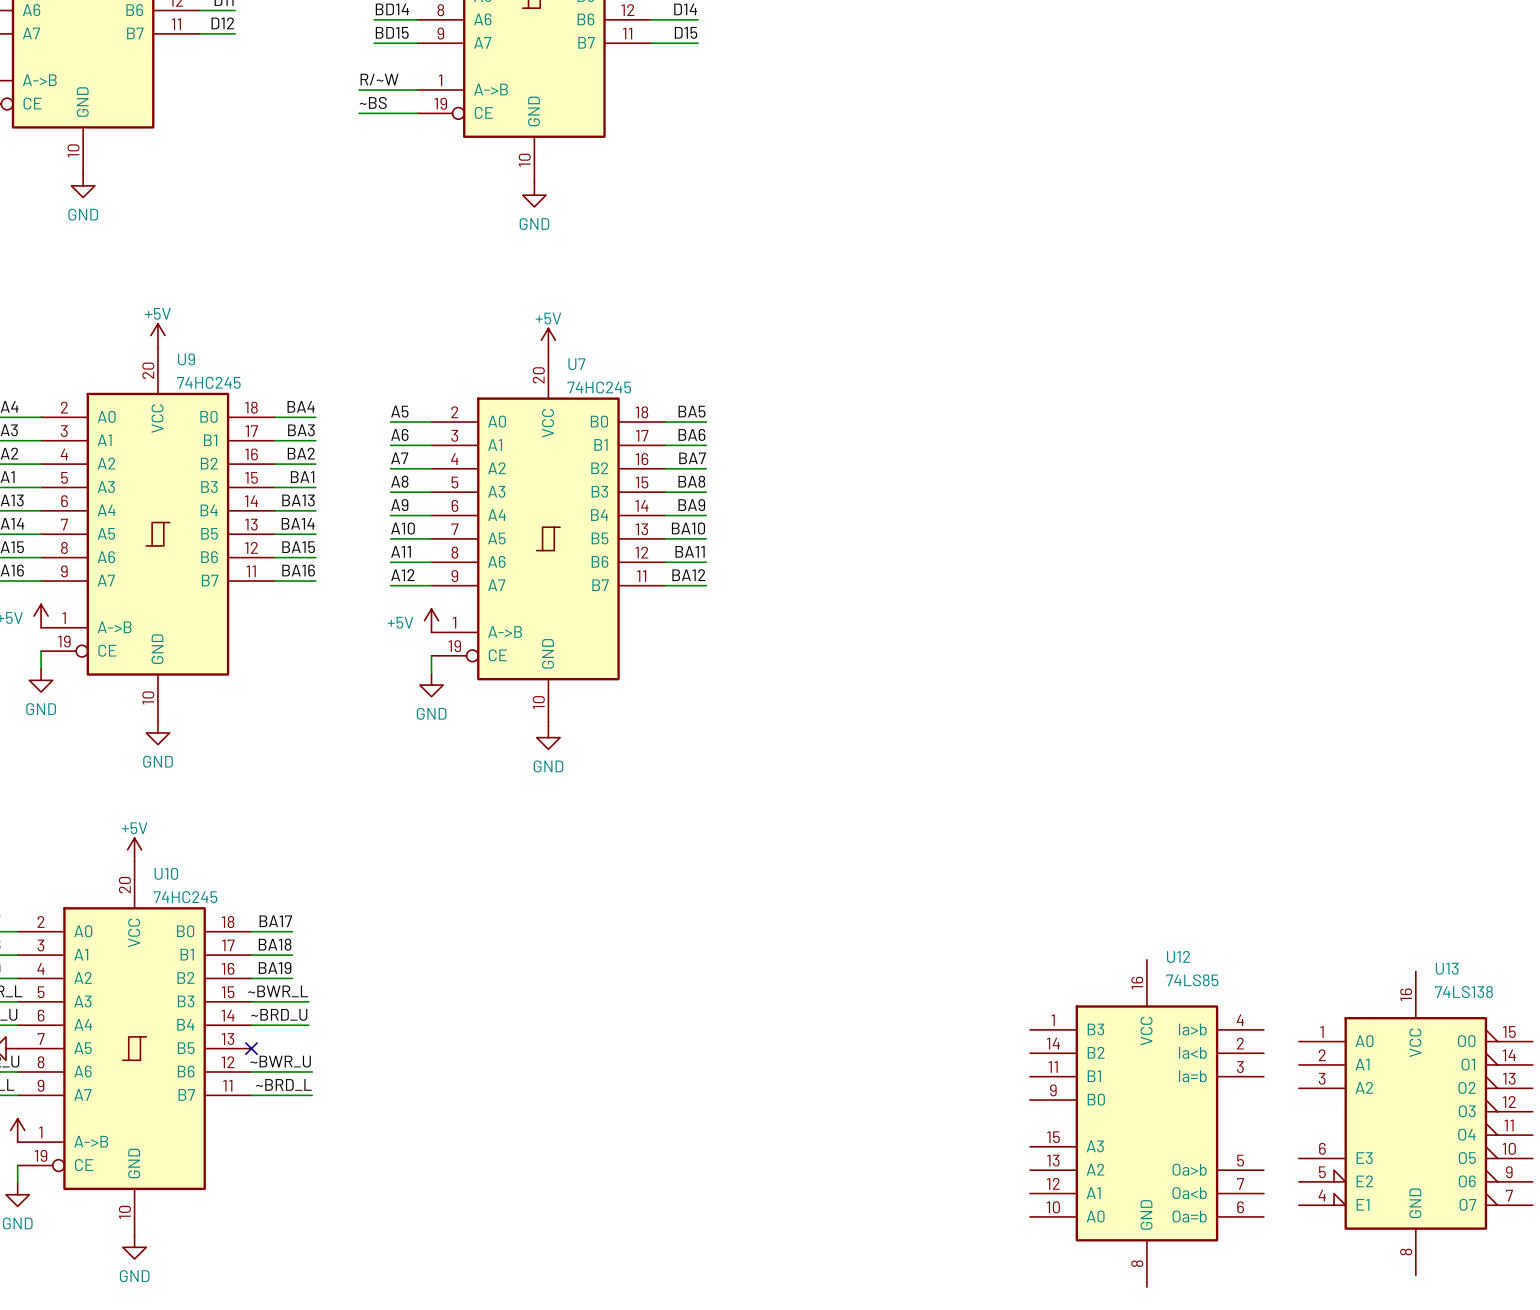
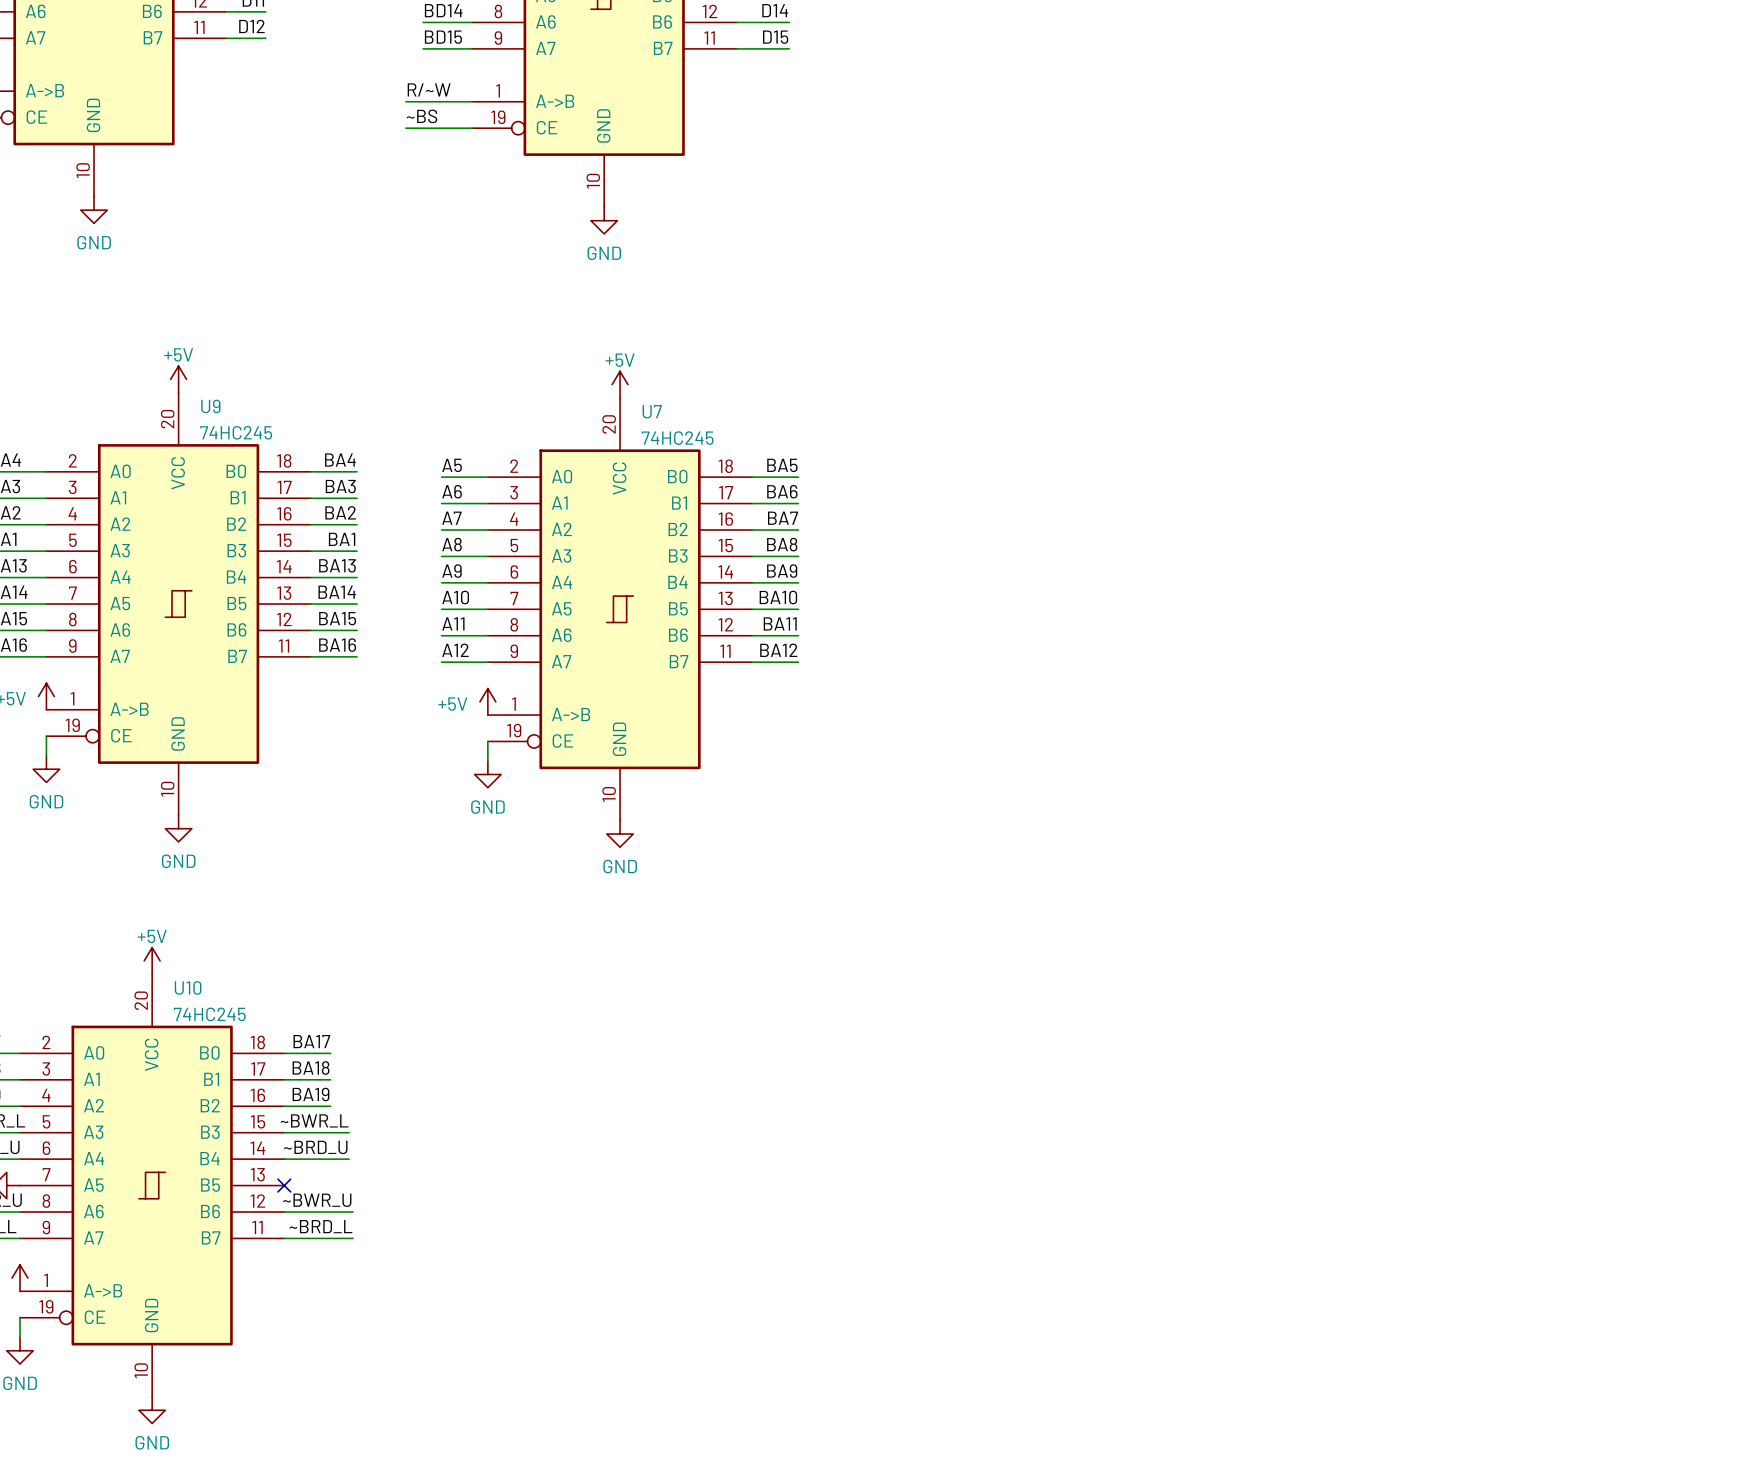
U12: 74LS85 (1146, 1123) -> none
U13: 74LS138 (1415, 1123) -> none

